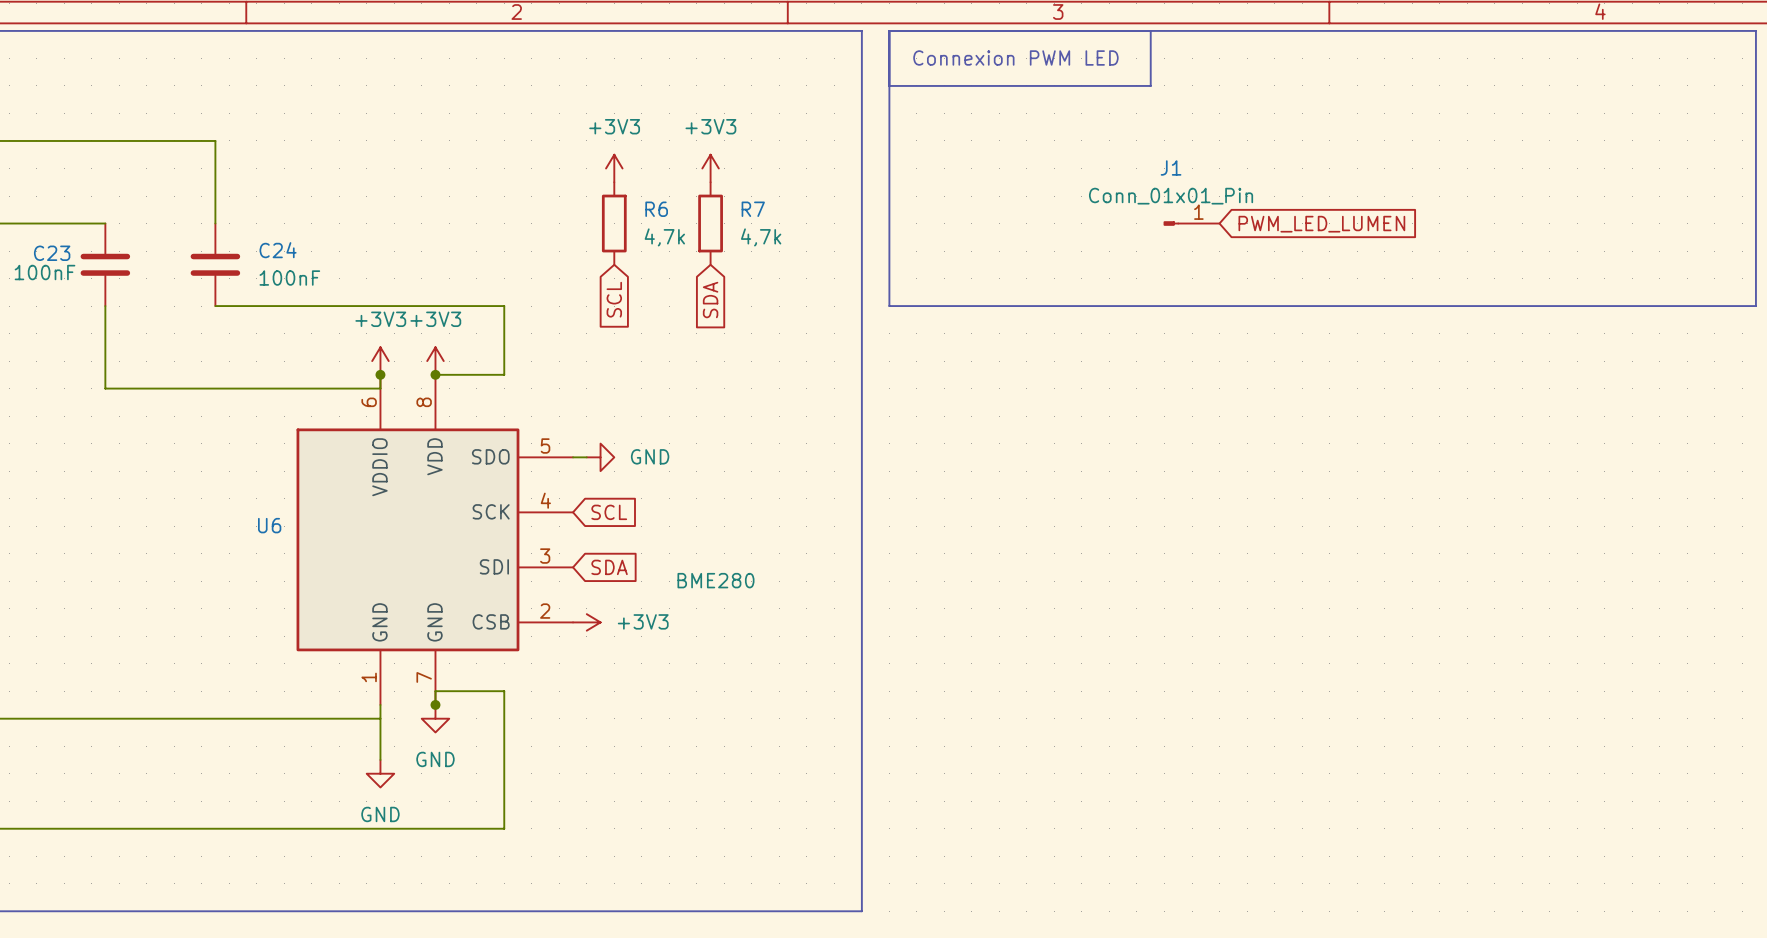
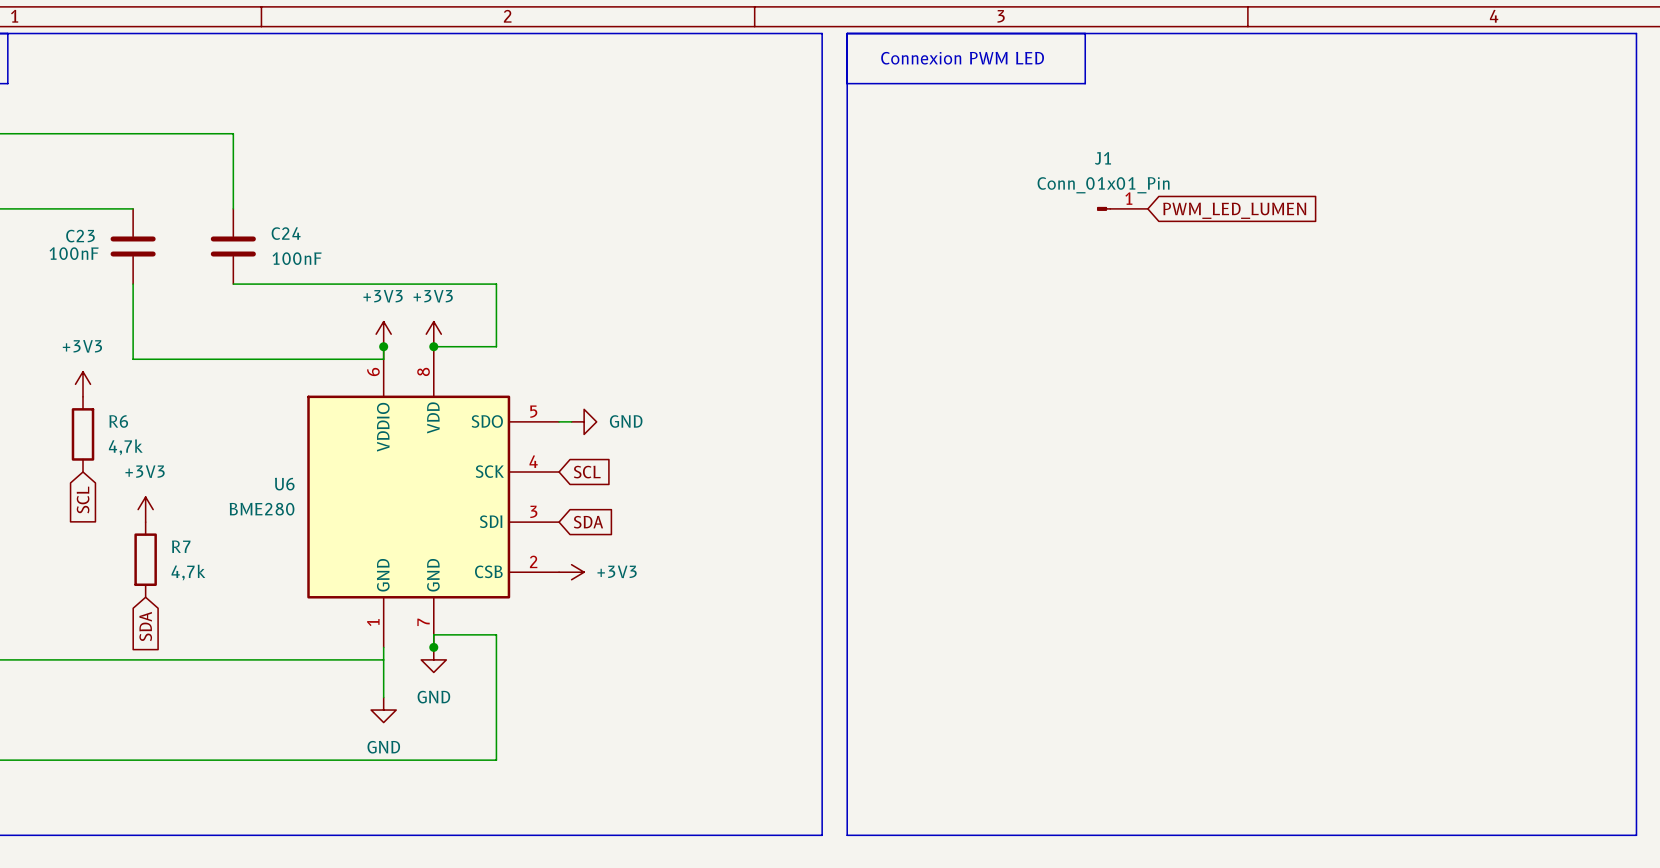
power symbol: +3V3 (614, 168) -> none
power symbol: +3V3 (710, 168) -> none
R6 position: (614, 223) -> (83, 434)
R7 position: (710, 223) -> (145, 559)
global label: SCL (614, 299) -> none
global label: SDA (710, 300) -> none
line: (889, 306) (1755, 306) -> (847, 284) (847, 835) (1636, 835) (1636, 284)
power symbol: none -> +3V3 (83, 384)
global label: none -> SCL (83, 500)
power symbol: none -> +3V3 (145, 509)
U6 value position: BME280 (715, 580) -> BME280 (262, 509)
global label: none -> SDA (145, 626)

